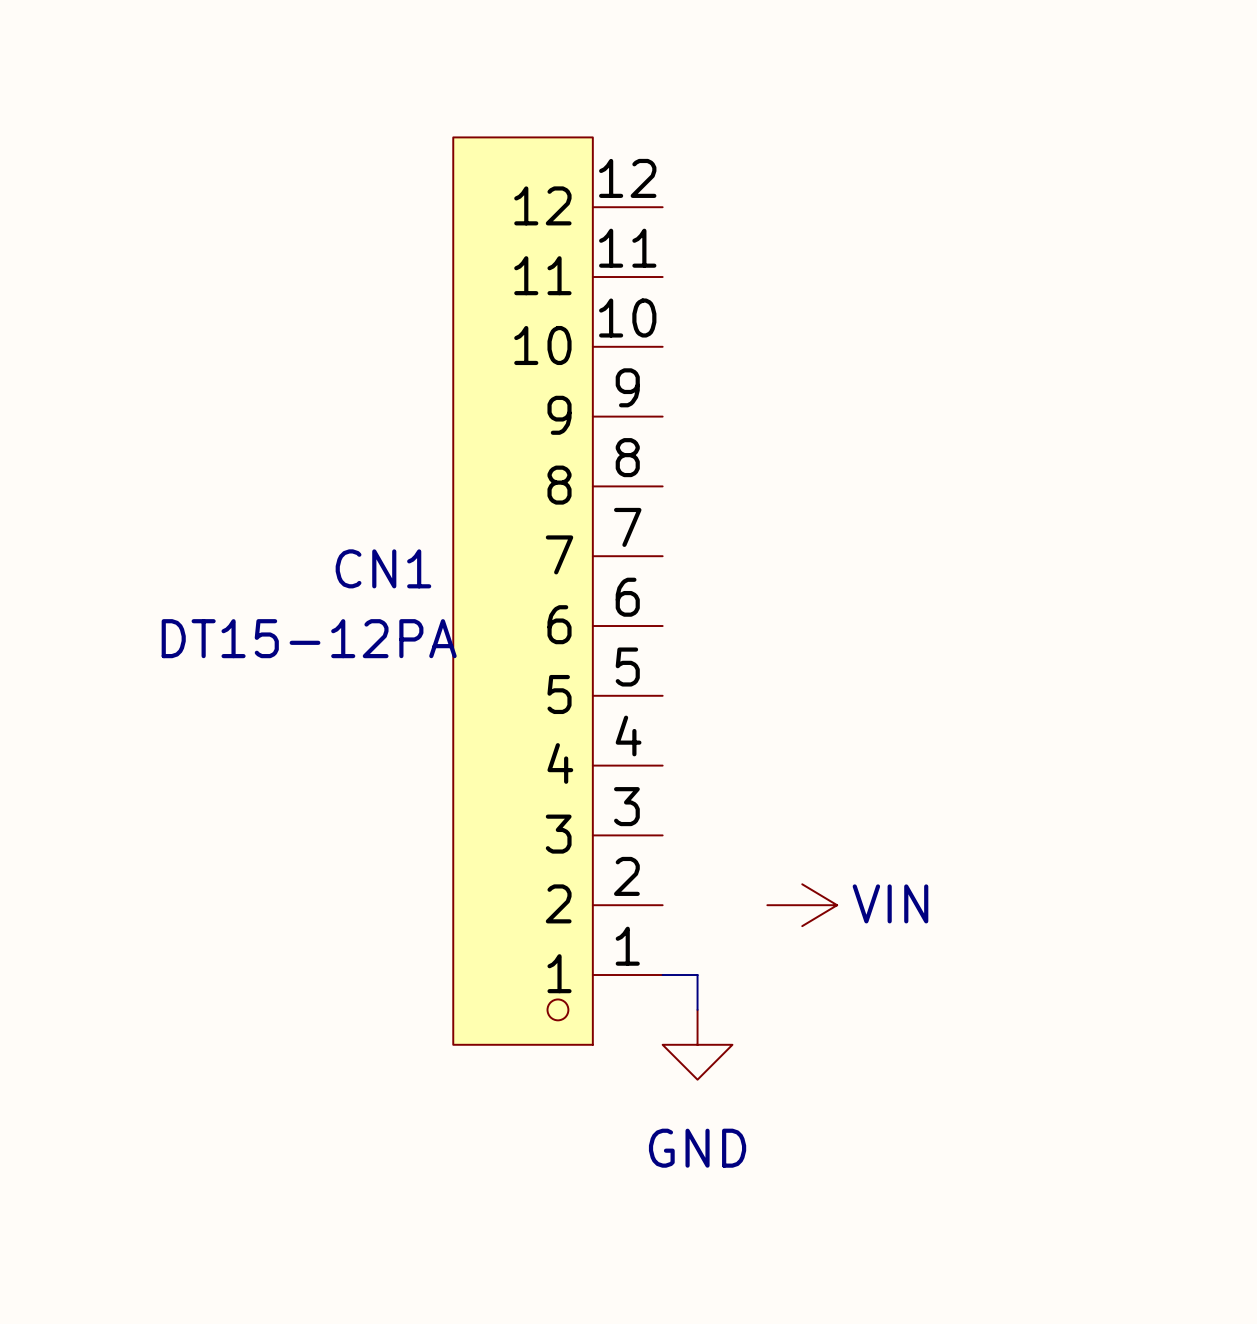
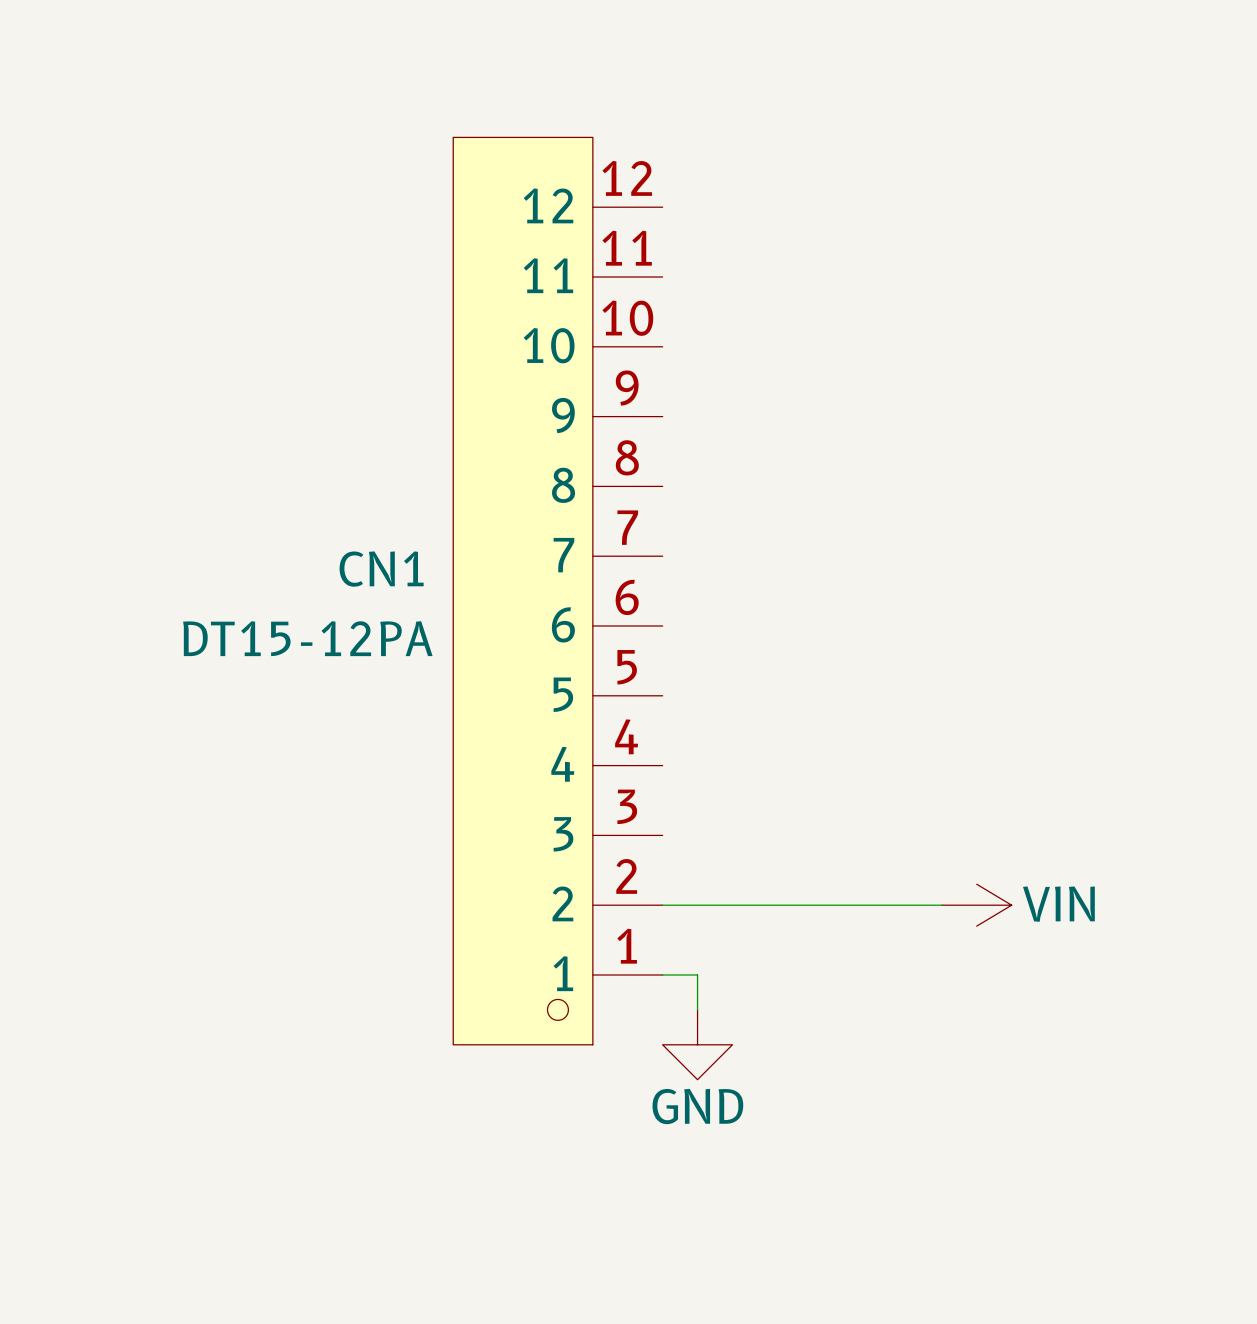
power symbol text position: VIN (890, 903) -> VIN (1058, 904)
wire: none -> (662, 905) (941, 905)
power symbol position: VIN (802, 905) -> VIN (976, 905)
power symbol text position: GND (697, 1148) -> GND (697, 1106)

